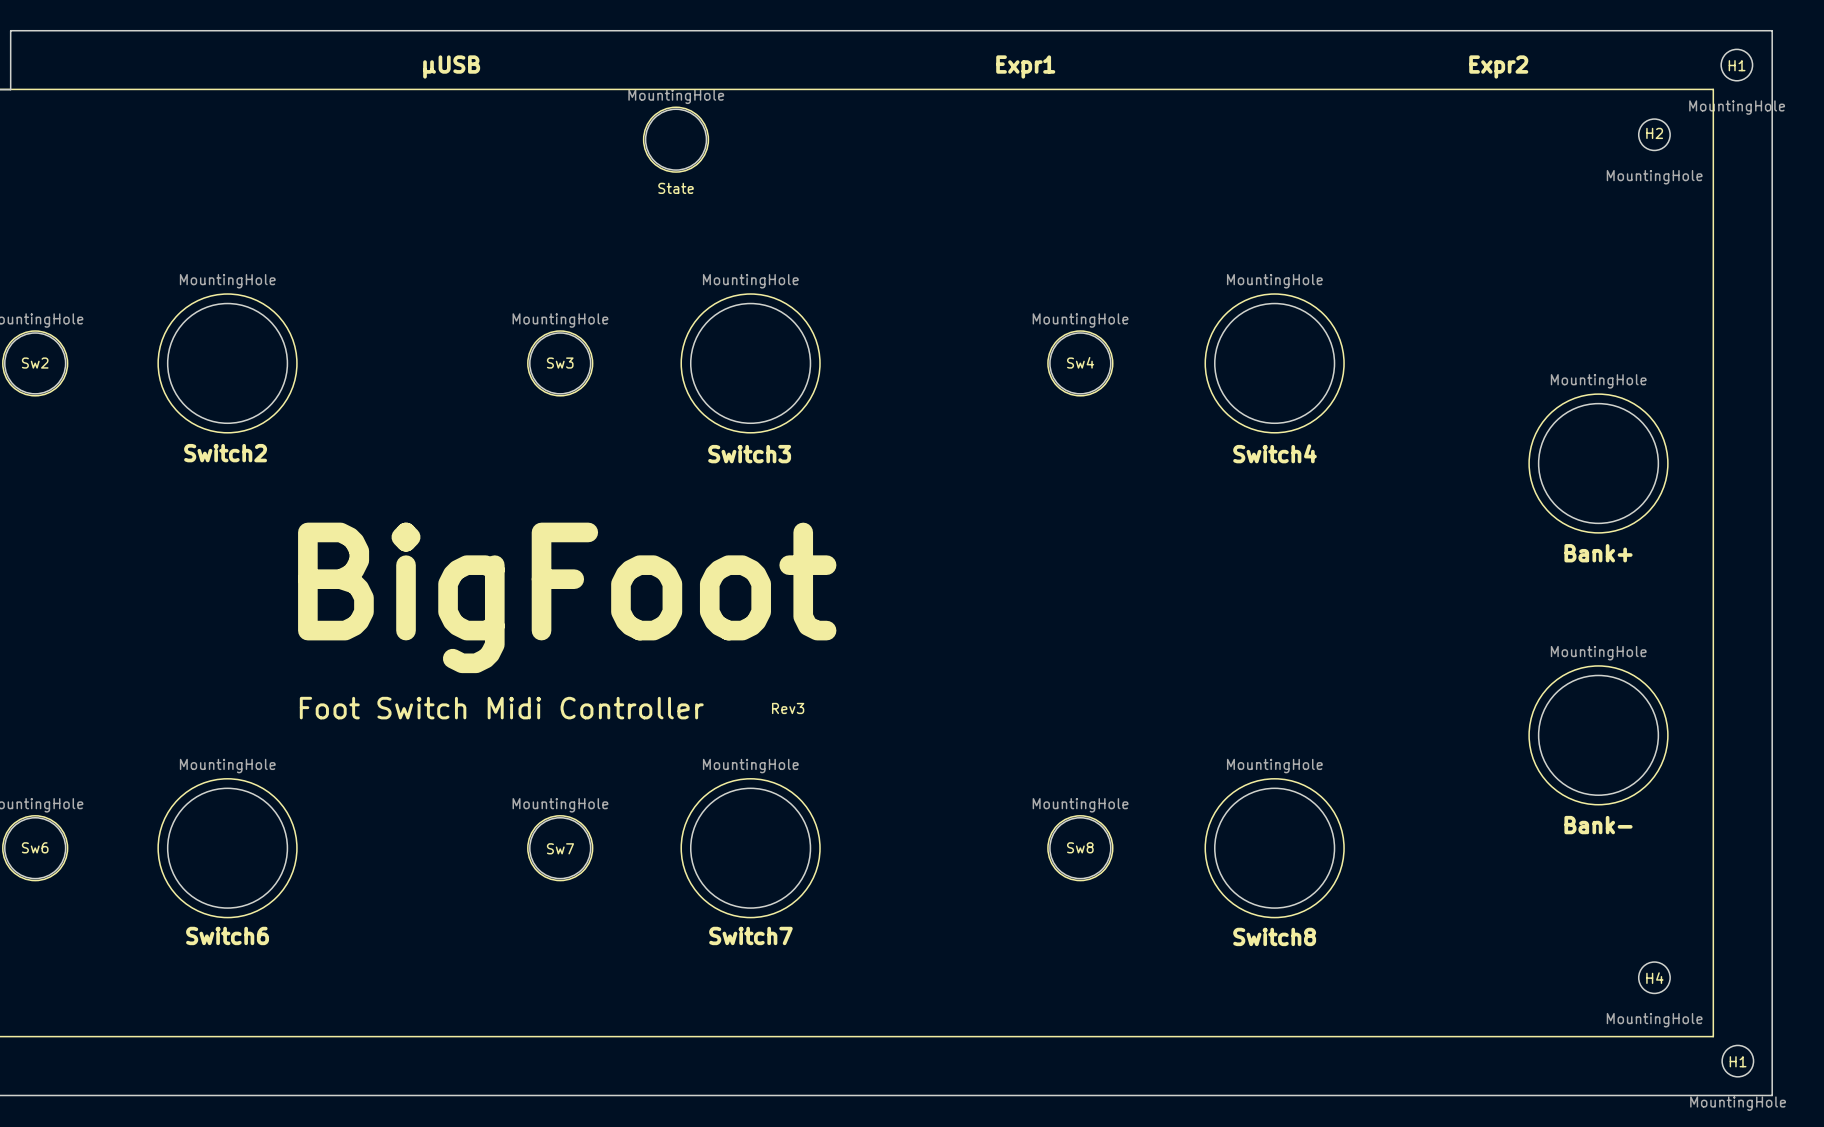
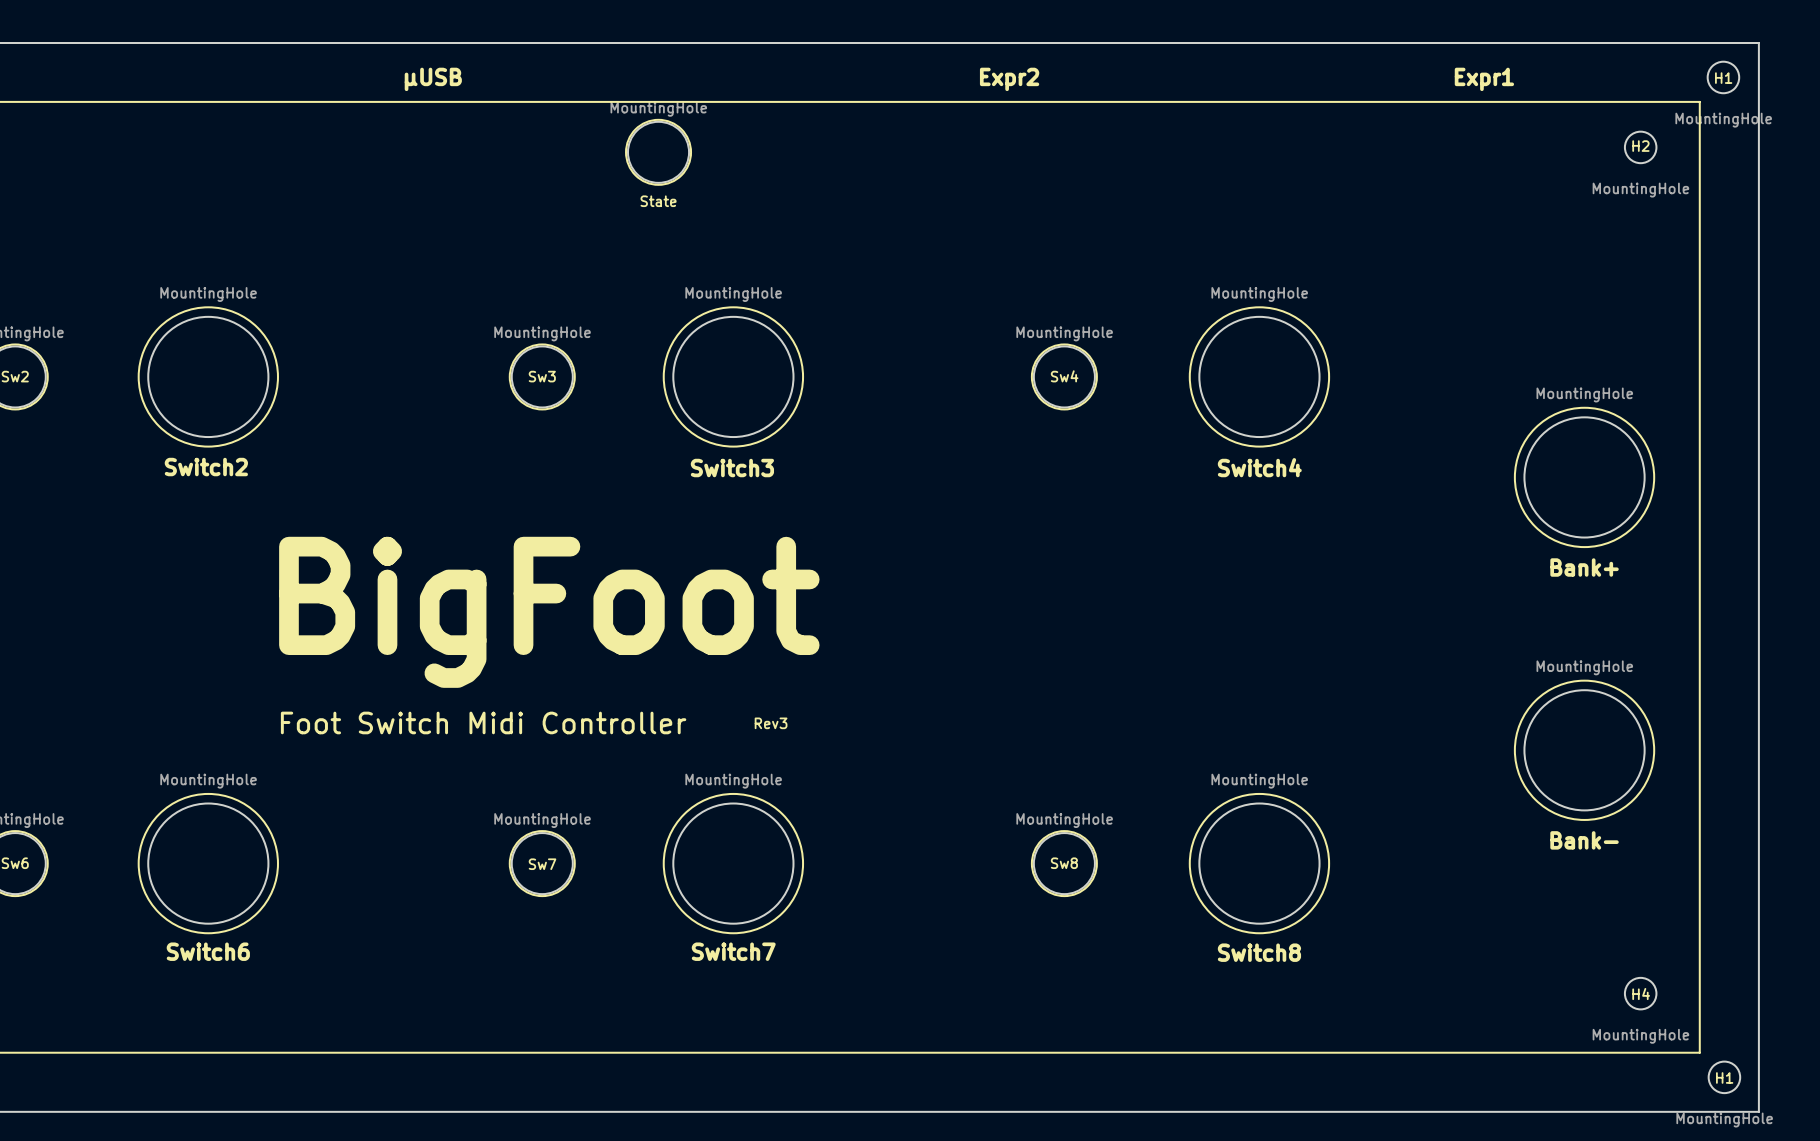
text: Expr1 (1025, 66) -> Expr2 (1009, 79)
text: Expr2 (1498, 66) -> Expr1 (1484, 79)

